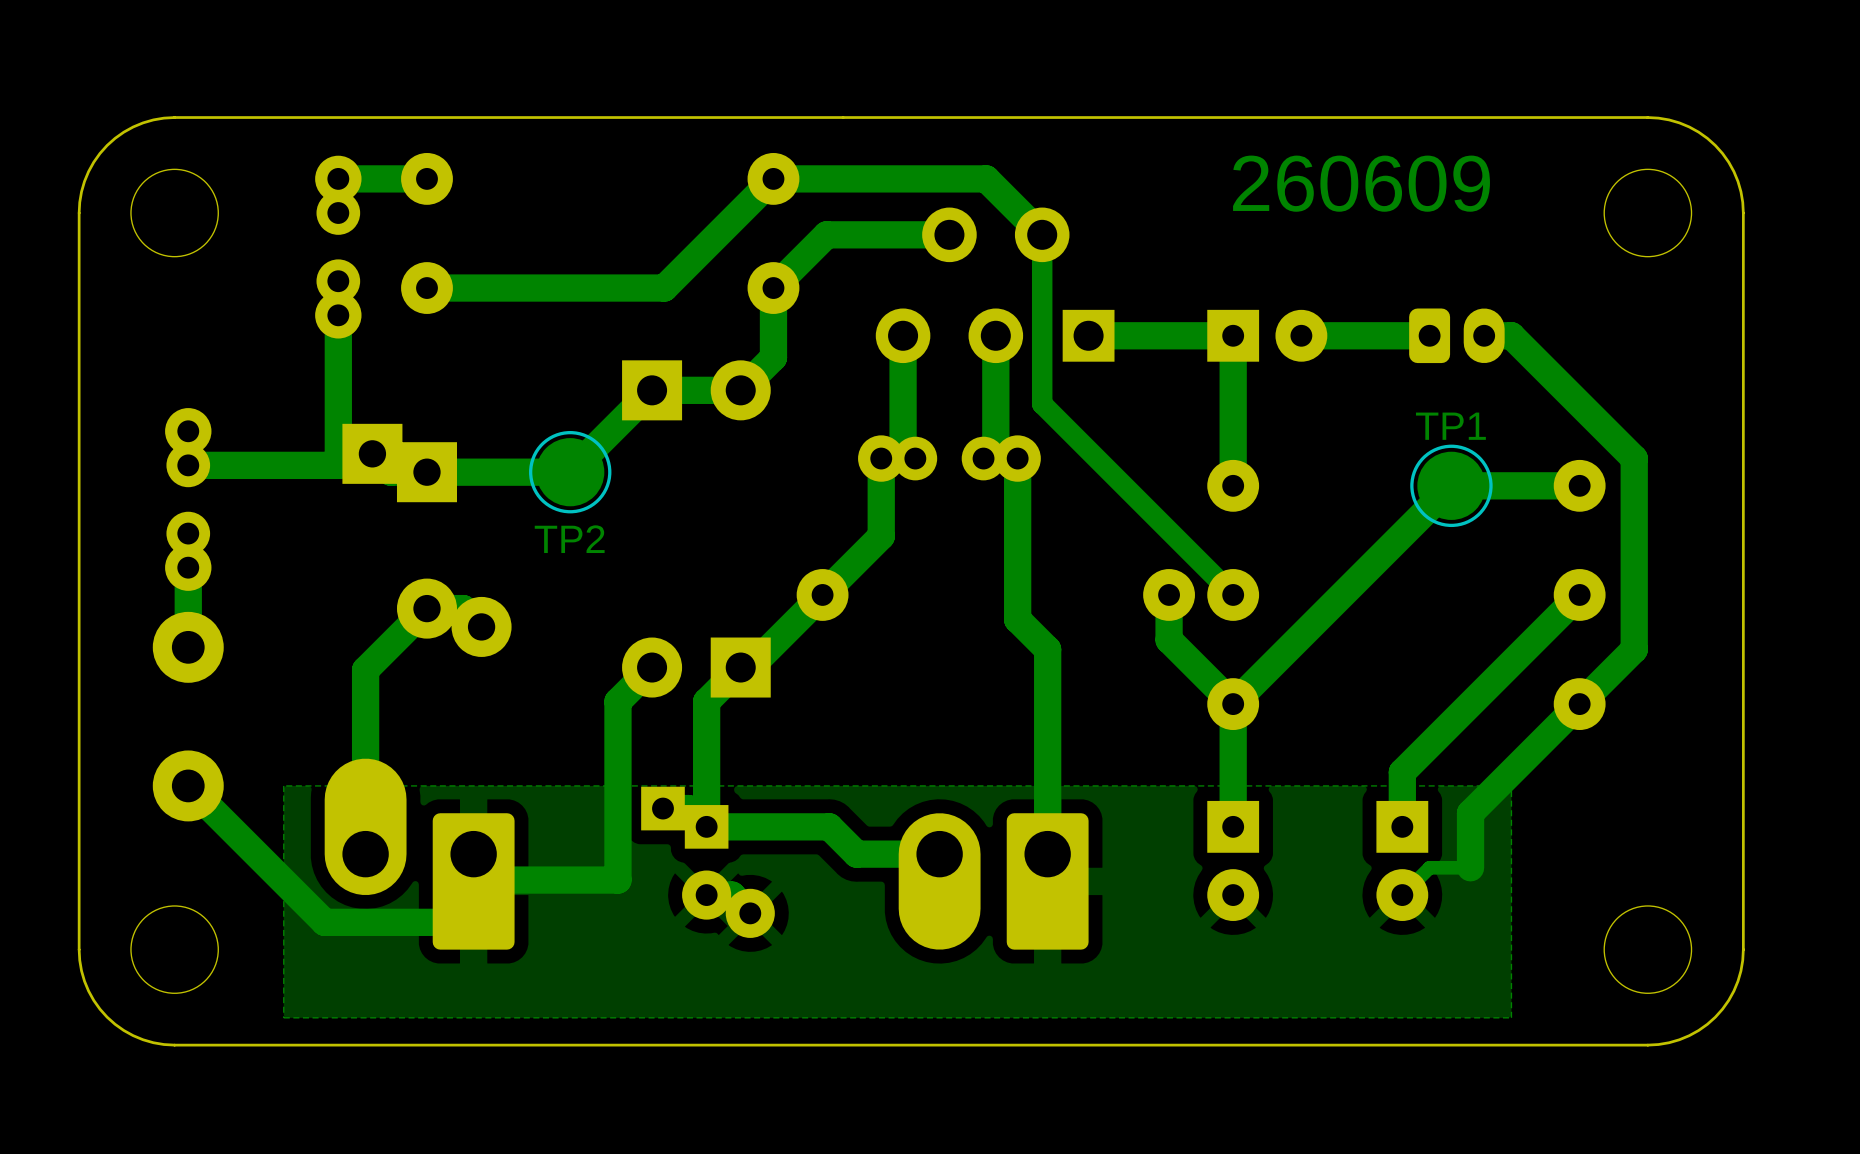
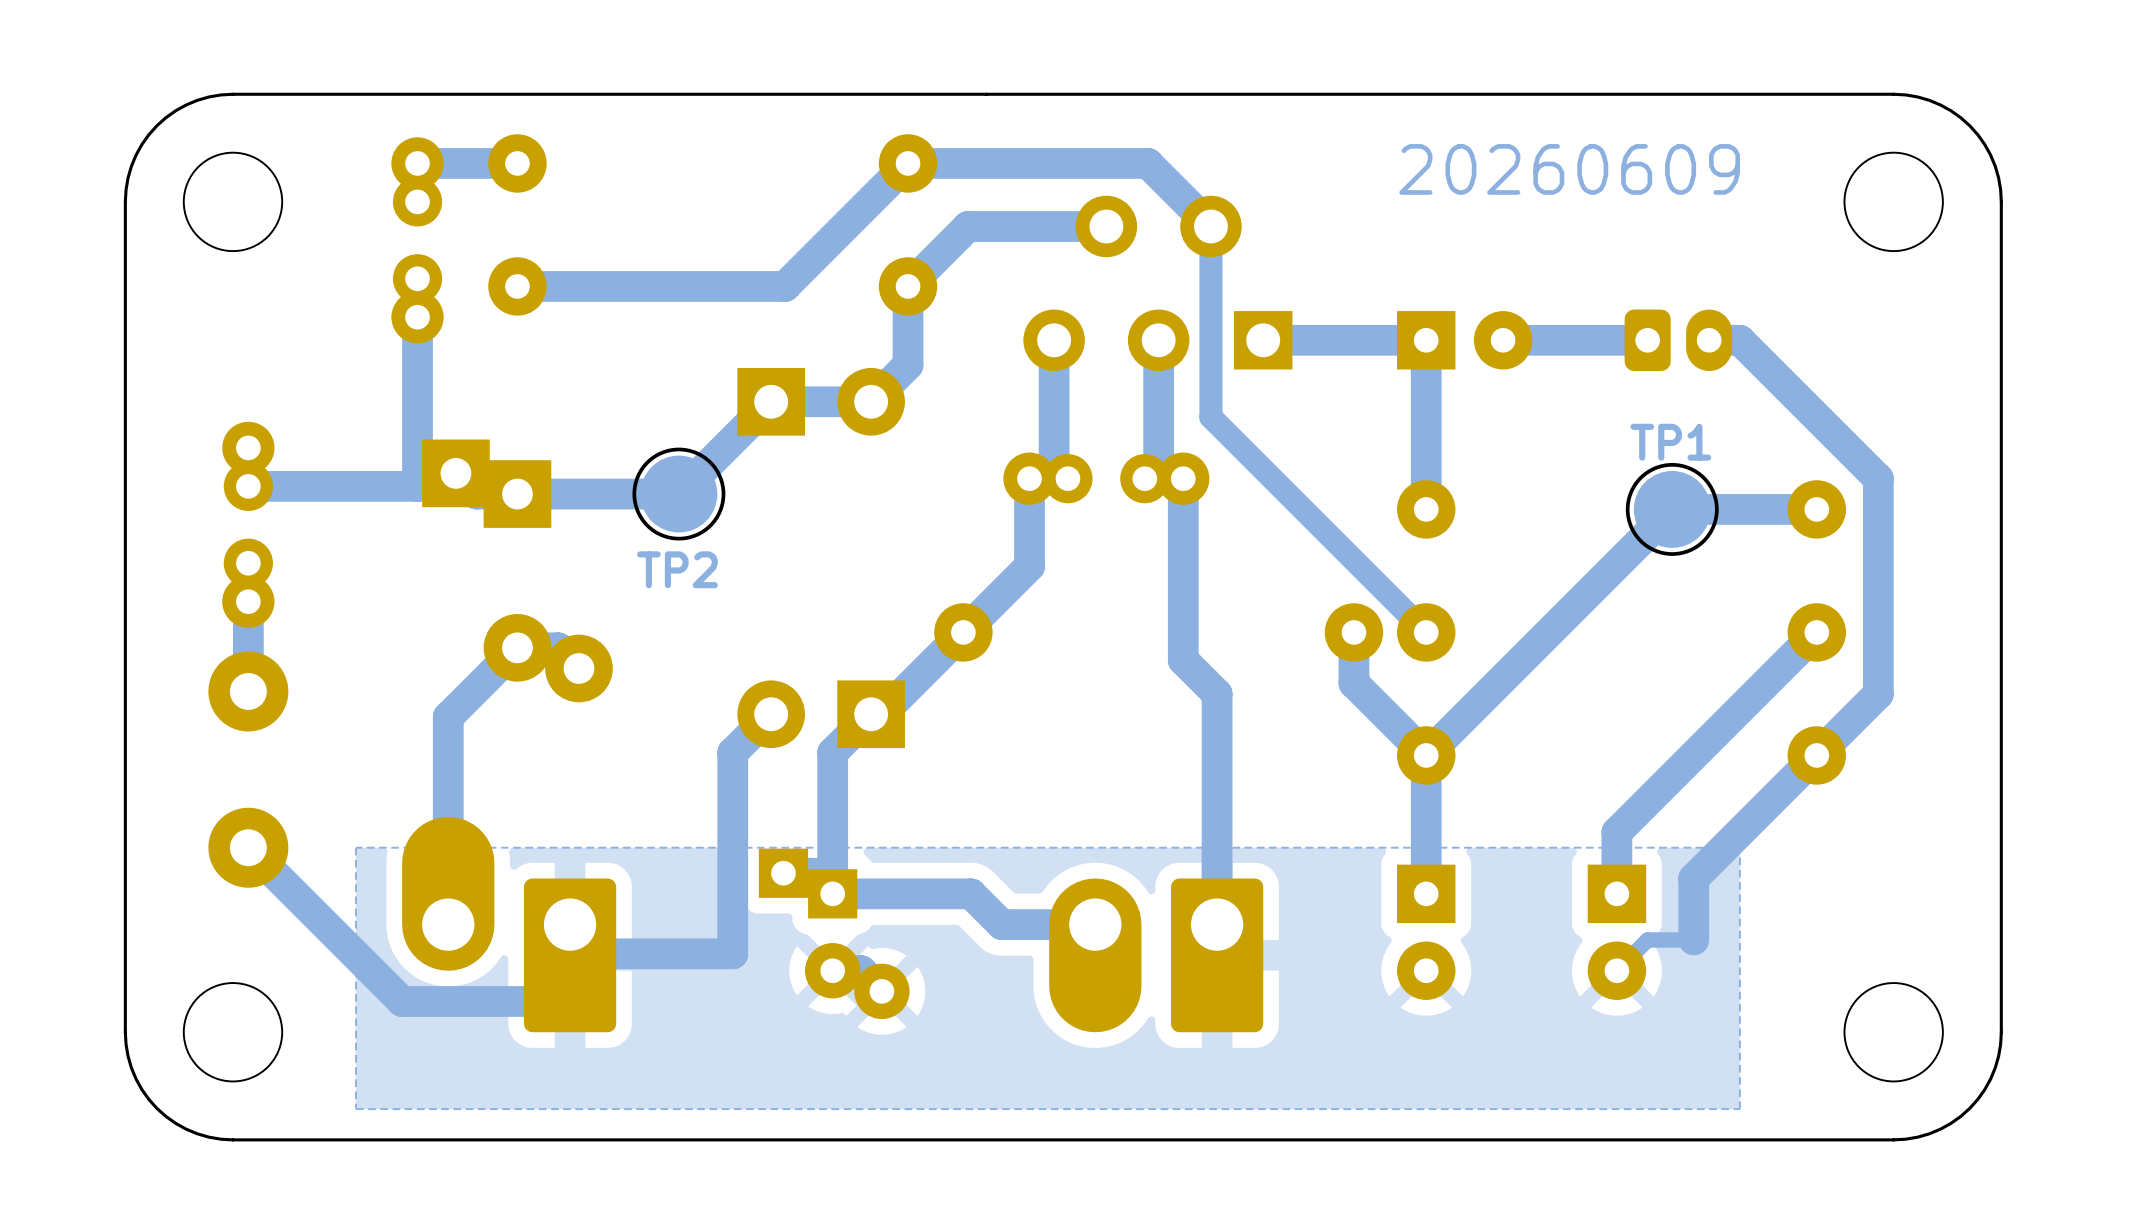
text: 260609 (1361, 183) -> 20260609 (1569, 169)

